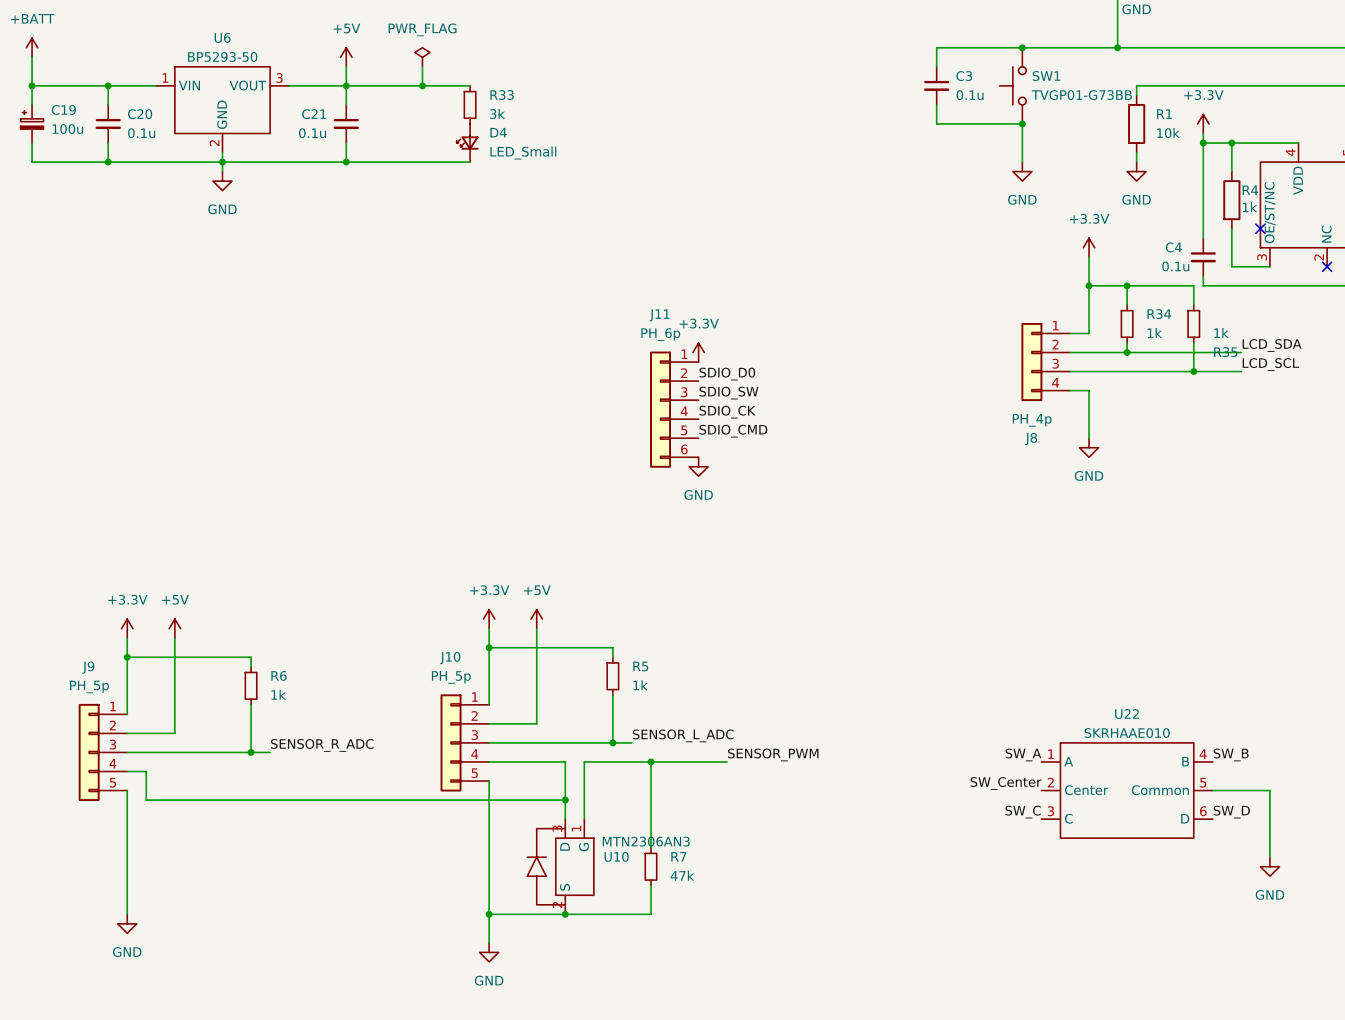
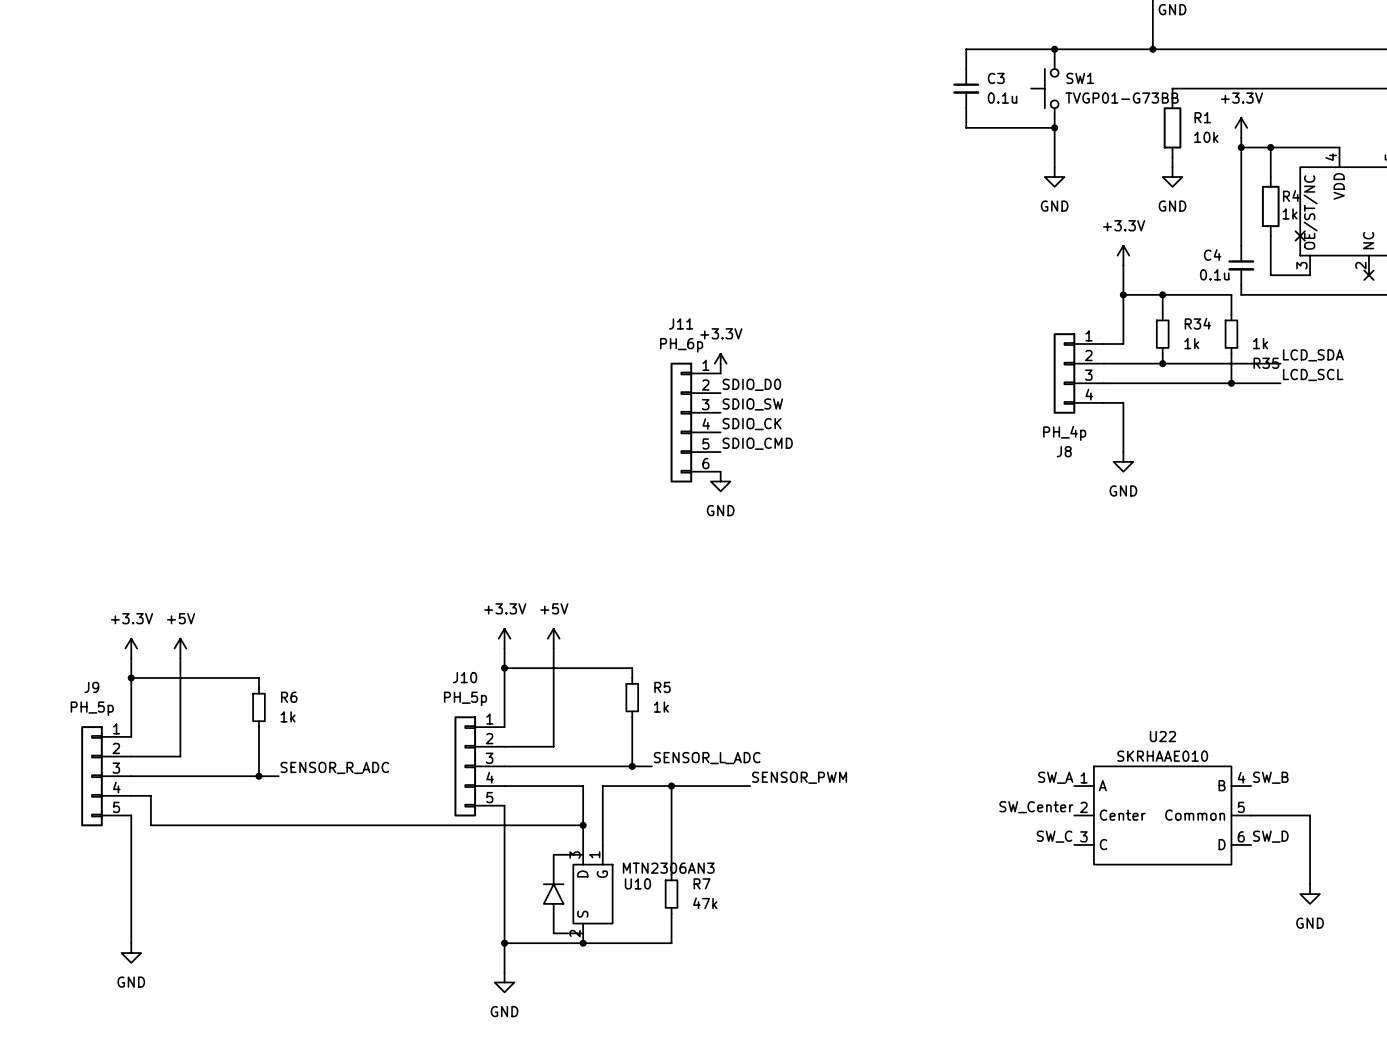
power symbol: +BATT (32, 47) -> none
wire: (32, 57) (32, 104) -> none
power symbol: +5V (346, 57) -> none
power symbol: PWR_FLAG (422, 57) -> none
wire: (346, 66) (346, 104) -> none
wire: (422, 66) (422, 85) -> none
wire: (32, 85) (155, 85) -> none
junction: (32, 85) -> none
wire: (108, 85) (108, 104) -> none
junction: (108, 85) -> none
wire: (289, 85) (470, 85) -> none
junction: (346, 85) -> none
junction: (422, 85) -> none
R33: 3k (470, 104) -> none
U6: BP5293-50 (222, 109) -> none
C19: 100u (32, 123) -> none
C20: 0.1u (108, 123) -> none
C21: 0.1u (346, 123) -> none
wire: (32, 143) (32, 162) (470, 162) -> none
wire: (108, 143) (108, 162) -> none
wire: (346, 143) (346, 162) -> none
D4: LED_Small (467, 143) -> none
wire: (222, 152) (222, 171) -> none
junction: (108, 162) -> none
junction: (222, 162) -> none
junction: (346, 162) -> none
power symbol: GND (222, 181) -> none

